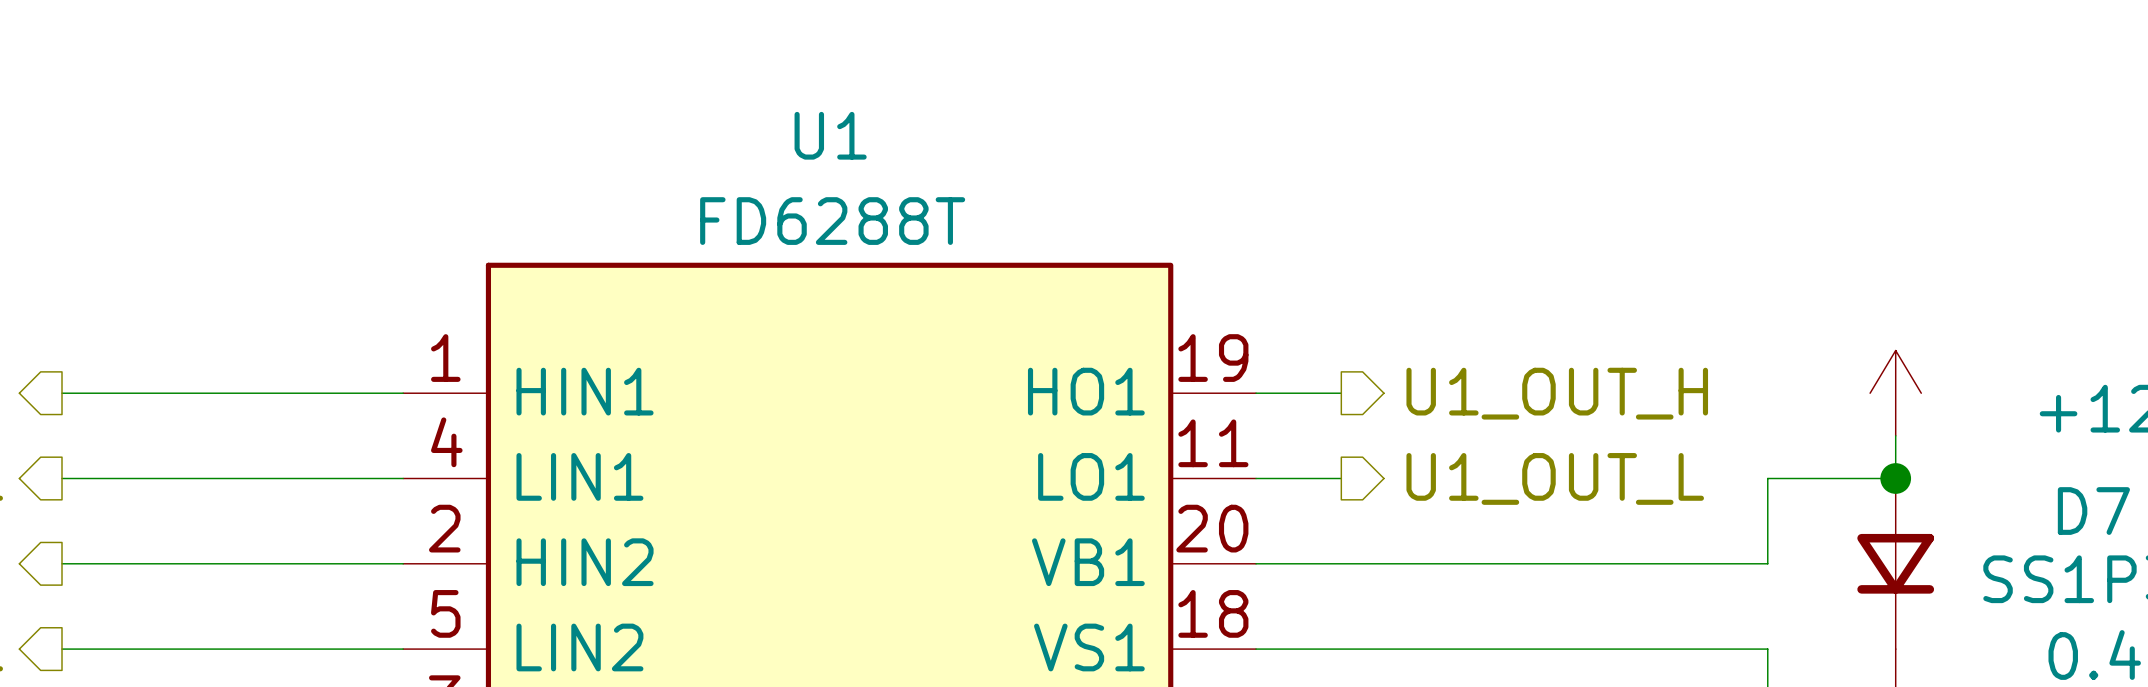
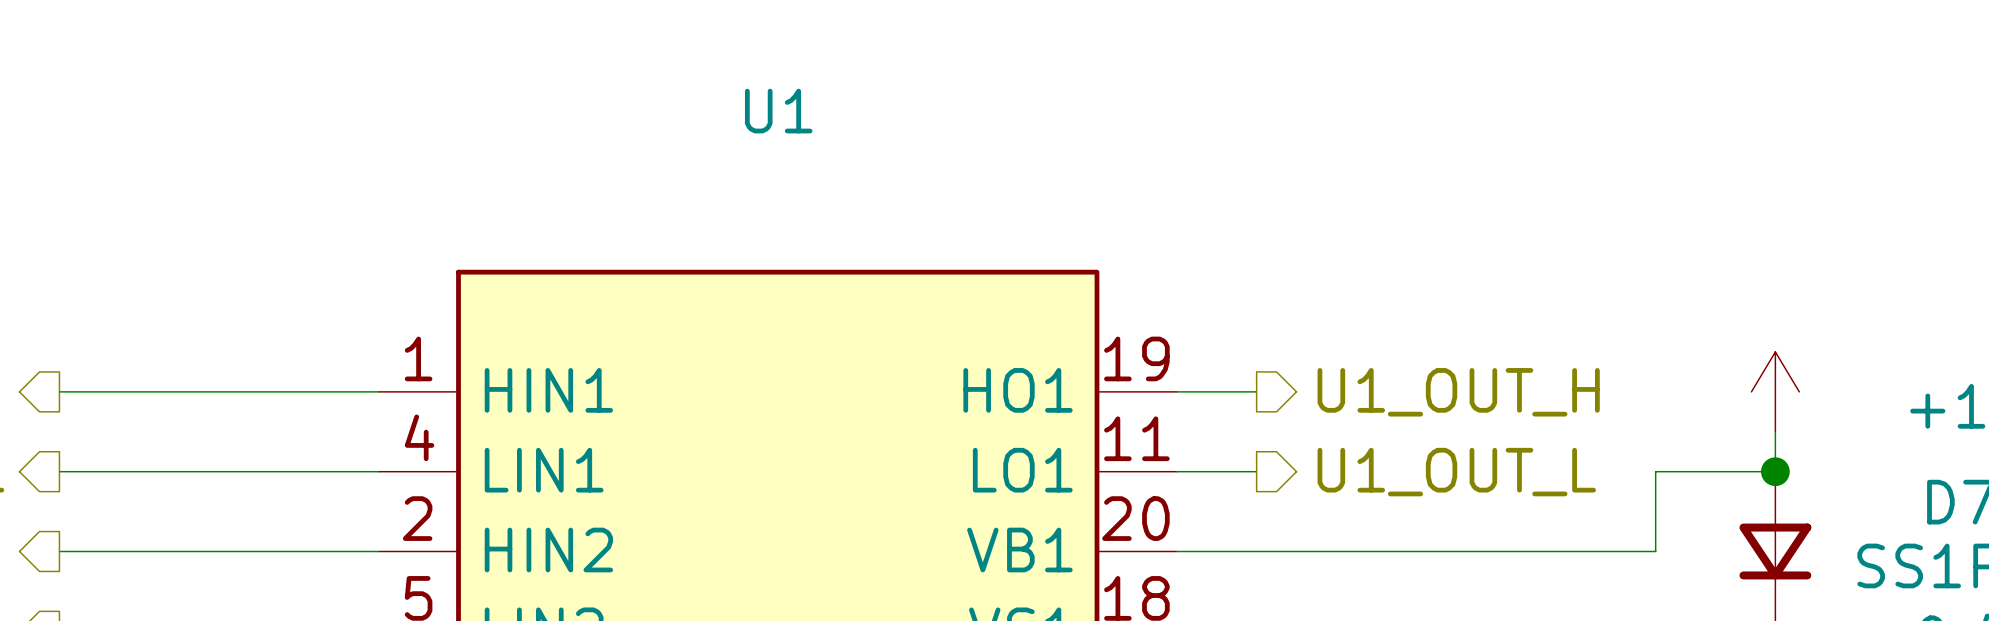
U1 name position: U1 (830, 135) -> U1 (778, 111)
U1 value: FD6288T (832, 221) -> none

